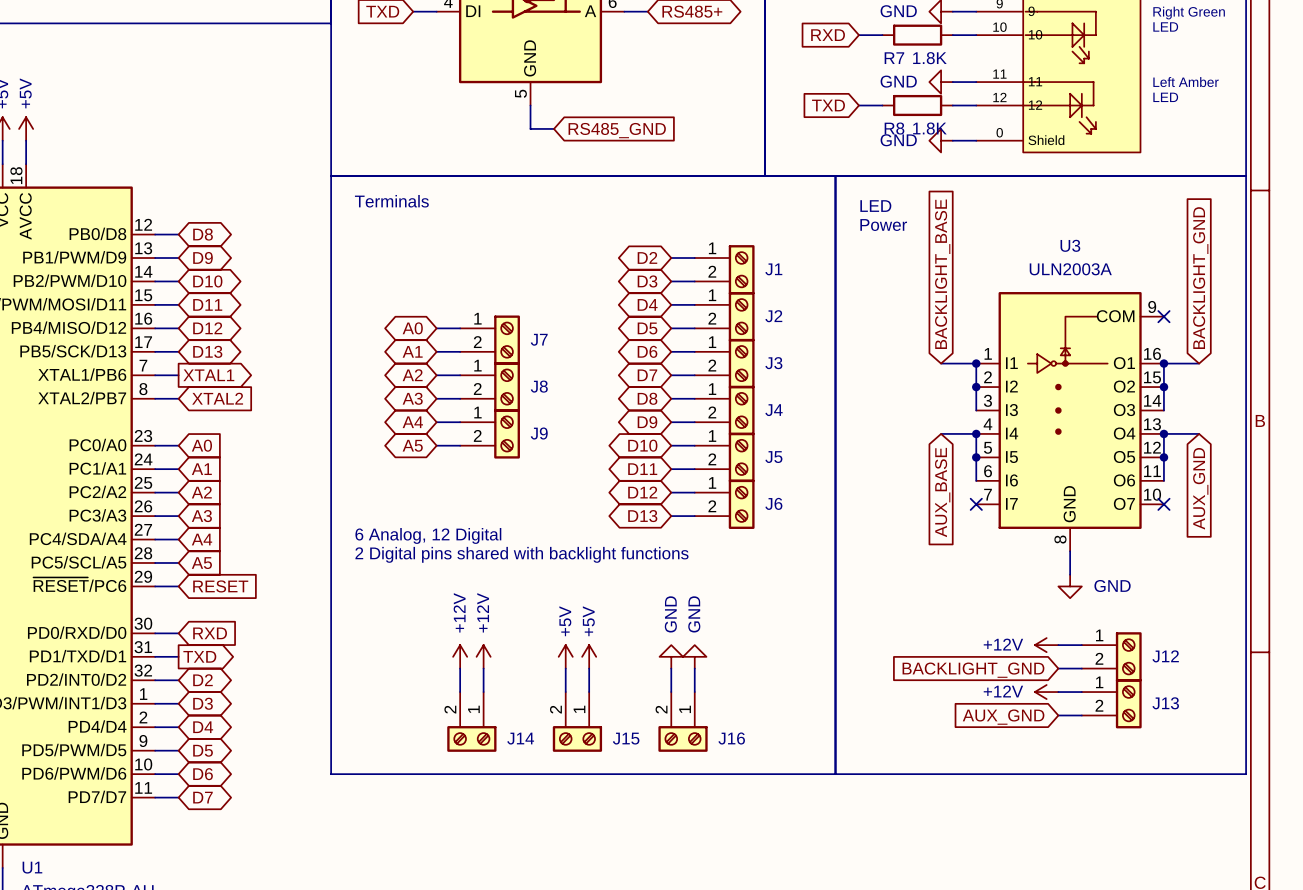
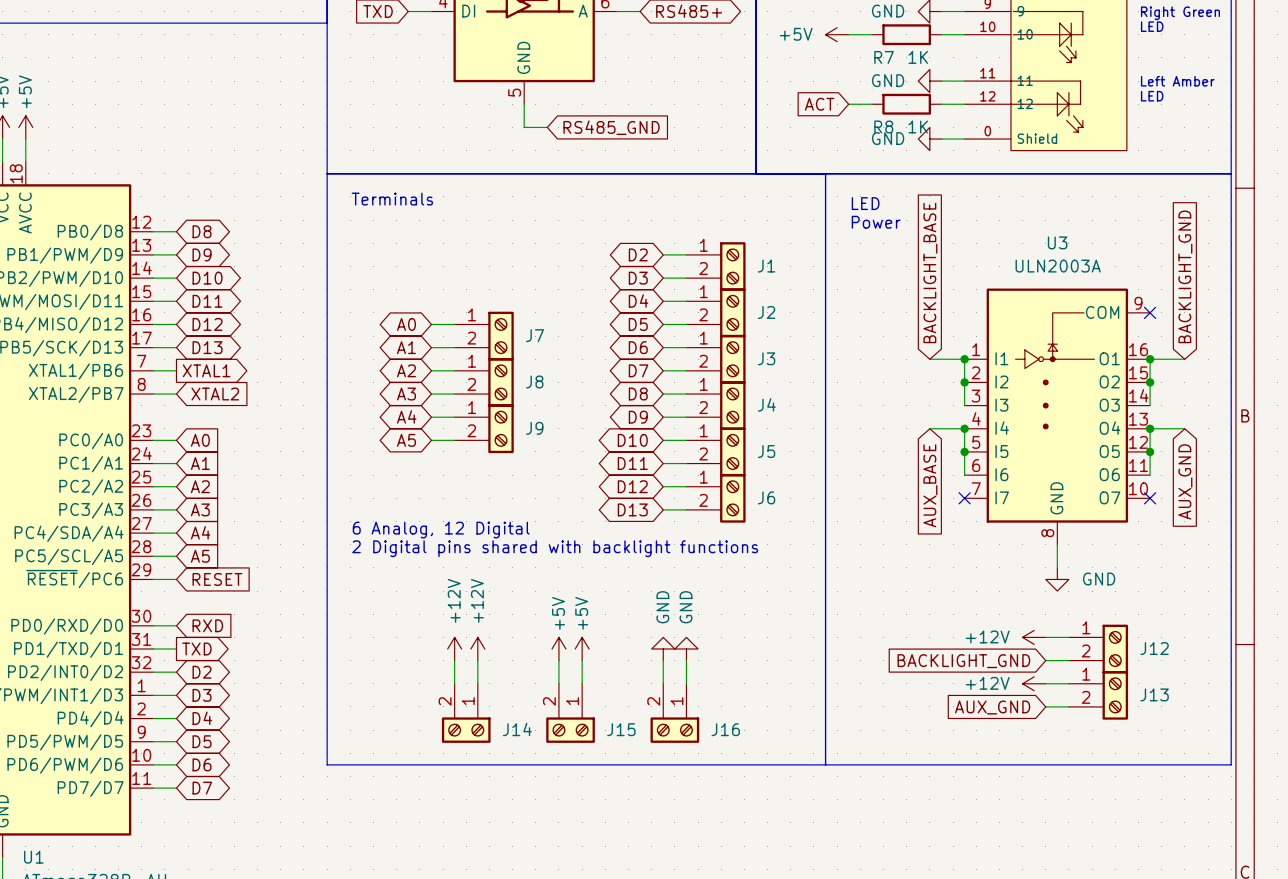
global label: RXD (828, 35) -> none
power symbol: none -> +5V (837, 34)
R7 value: 1.8K (929, 58) -> 1K (918, 57)
global label: TXD (828, 105) -> ACT (819, 104)
R8 value: 1.8K (929, 128) -> 1K (918, 126)

